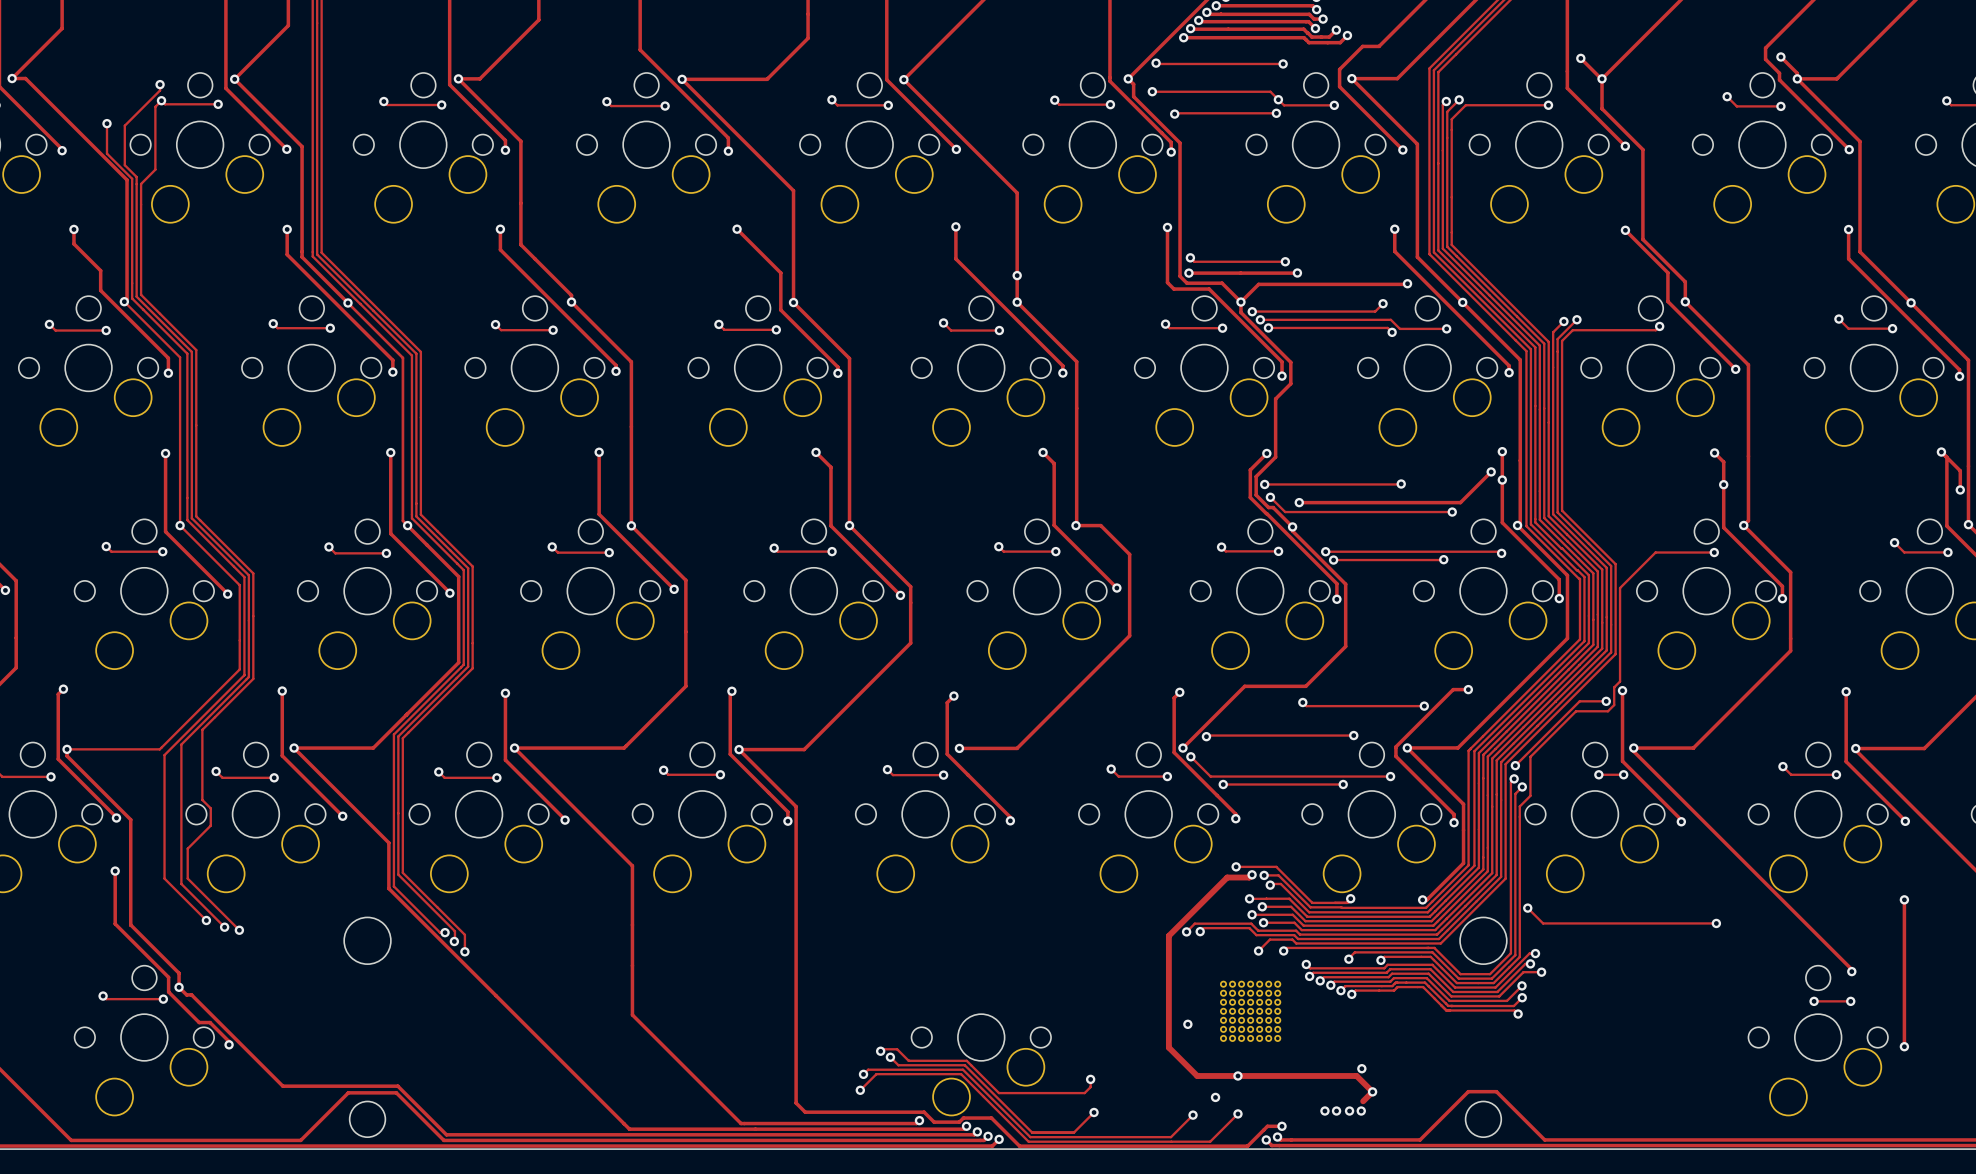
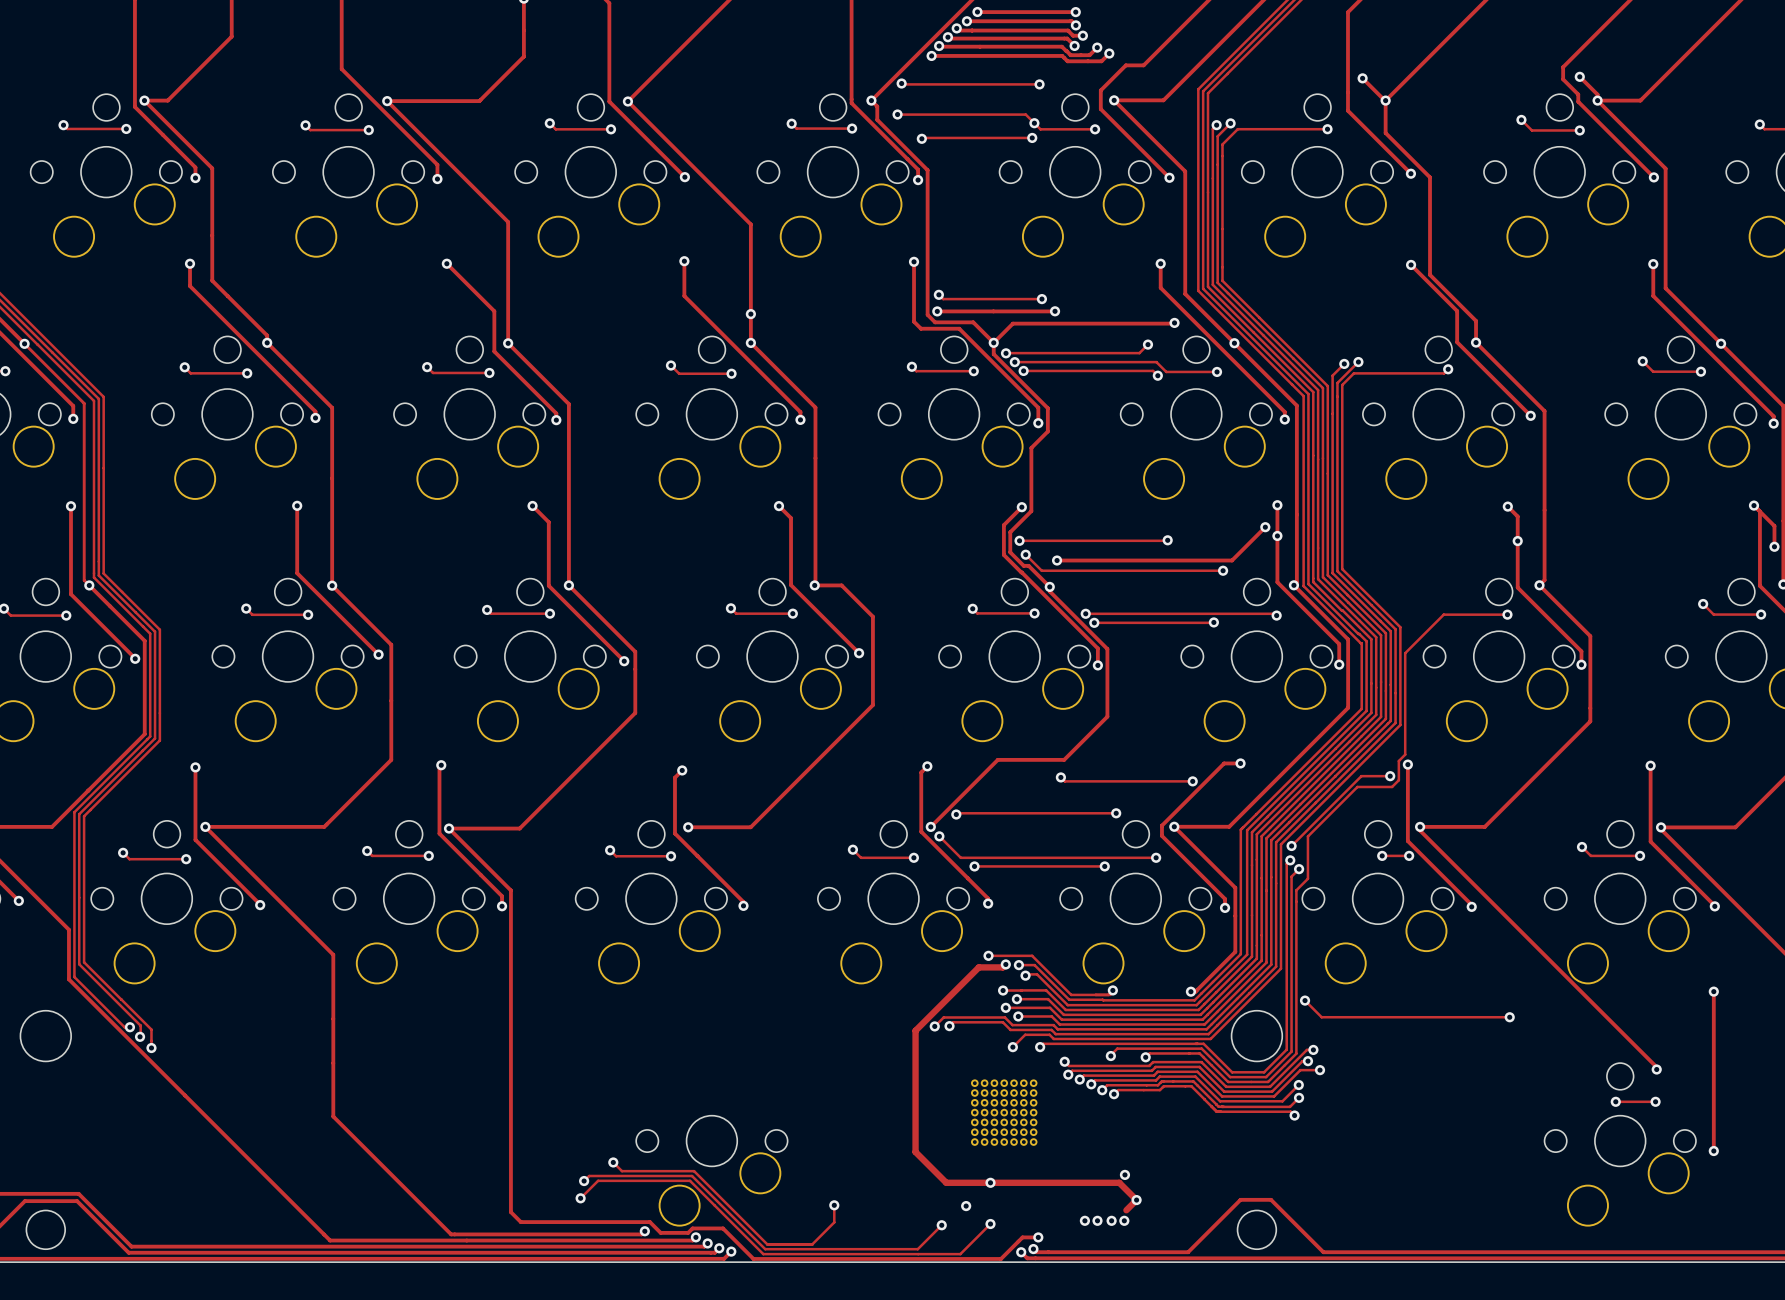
via: (1187, 1024) -> none
track: (880, 1051) (882, 1049) (897, 1049) (908, 1060) (966, 1060) (998, 1093) (1084, 1093) (1090, 1087) (1090, 1079) -> none
via: (880, 1051) -> none
via: (1090, 1079) -> none
track: none -> (834, 1205) (834, 1222)
via: none -> (834, 1205)
via: (1094, 1112) -> none

